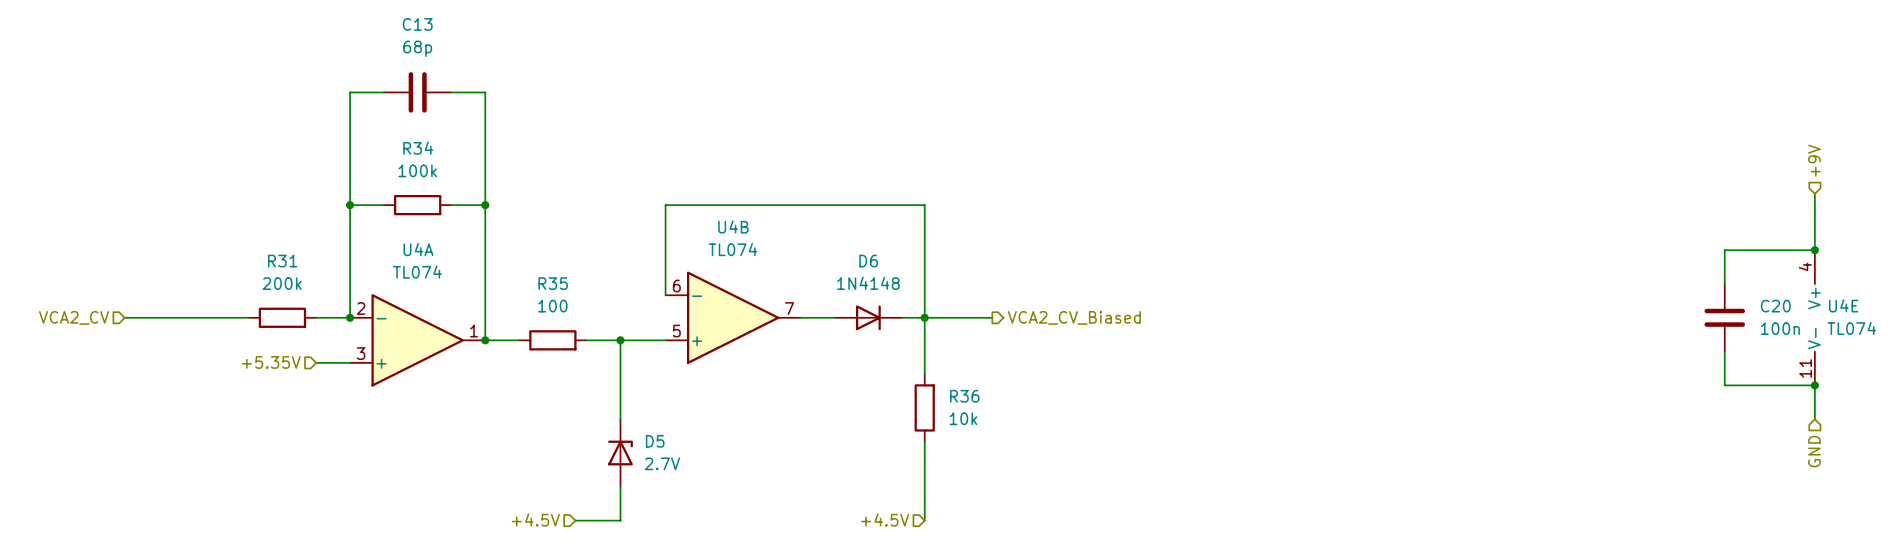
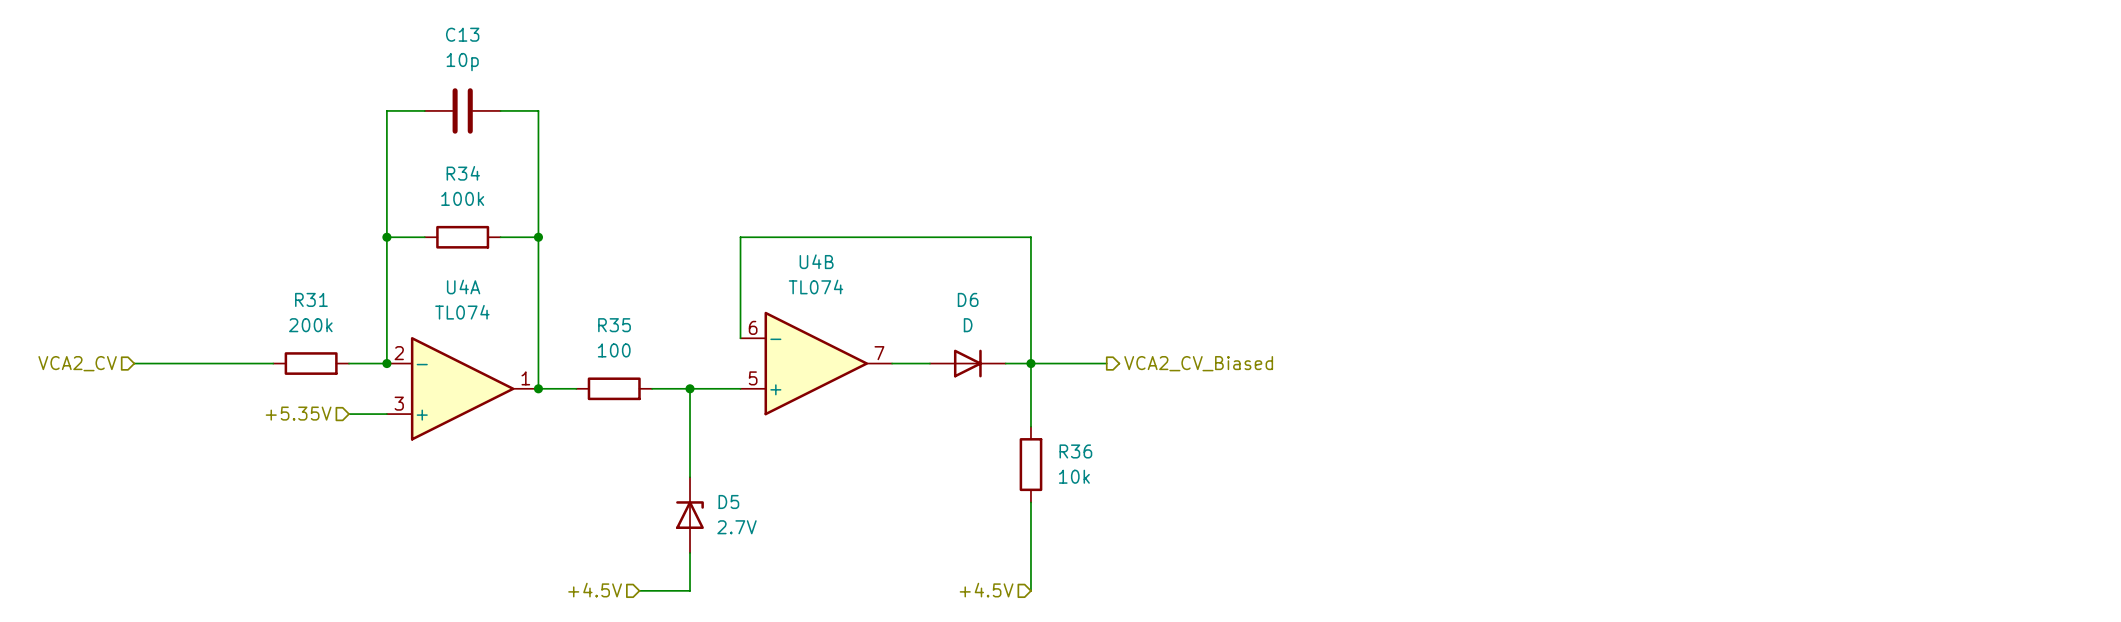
C13 value: 68p (417, 48) -> 10p (462, 62)
hierarchical label: +9V (1814, 160) -> none
wire: (1814, 193) (1814, 250) (1724, 250) (1724, 283) -> none
junction: (1814, 250) -> none
D6 value: 1N4148 (868, 283) -> D (968, 325)
C20: 100n (1724, 317) -> none
U4E: TL074 (1814, 317) -> none
wire: (1724, 351) (1724, 385) (1814, 385) (1814, 419) -> none
junction: (1814, 385) -> none
hierarchical label: GND (1814, 451) -> none

